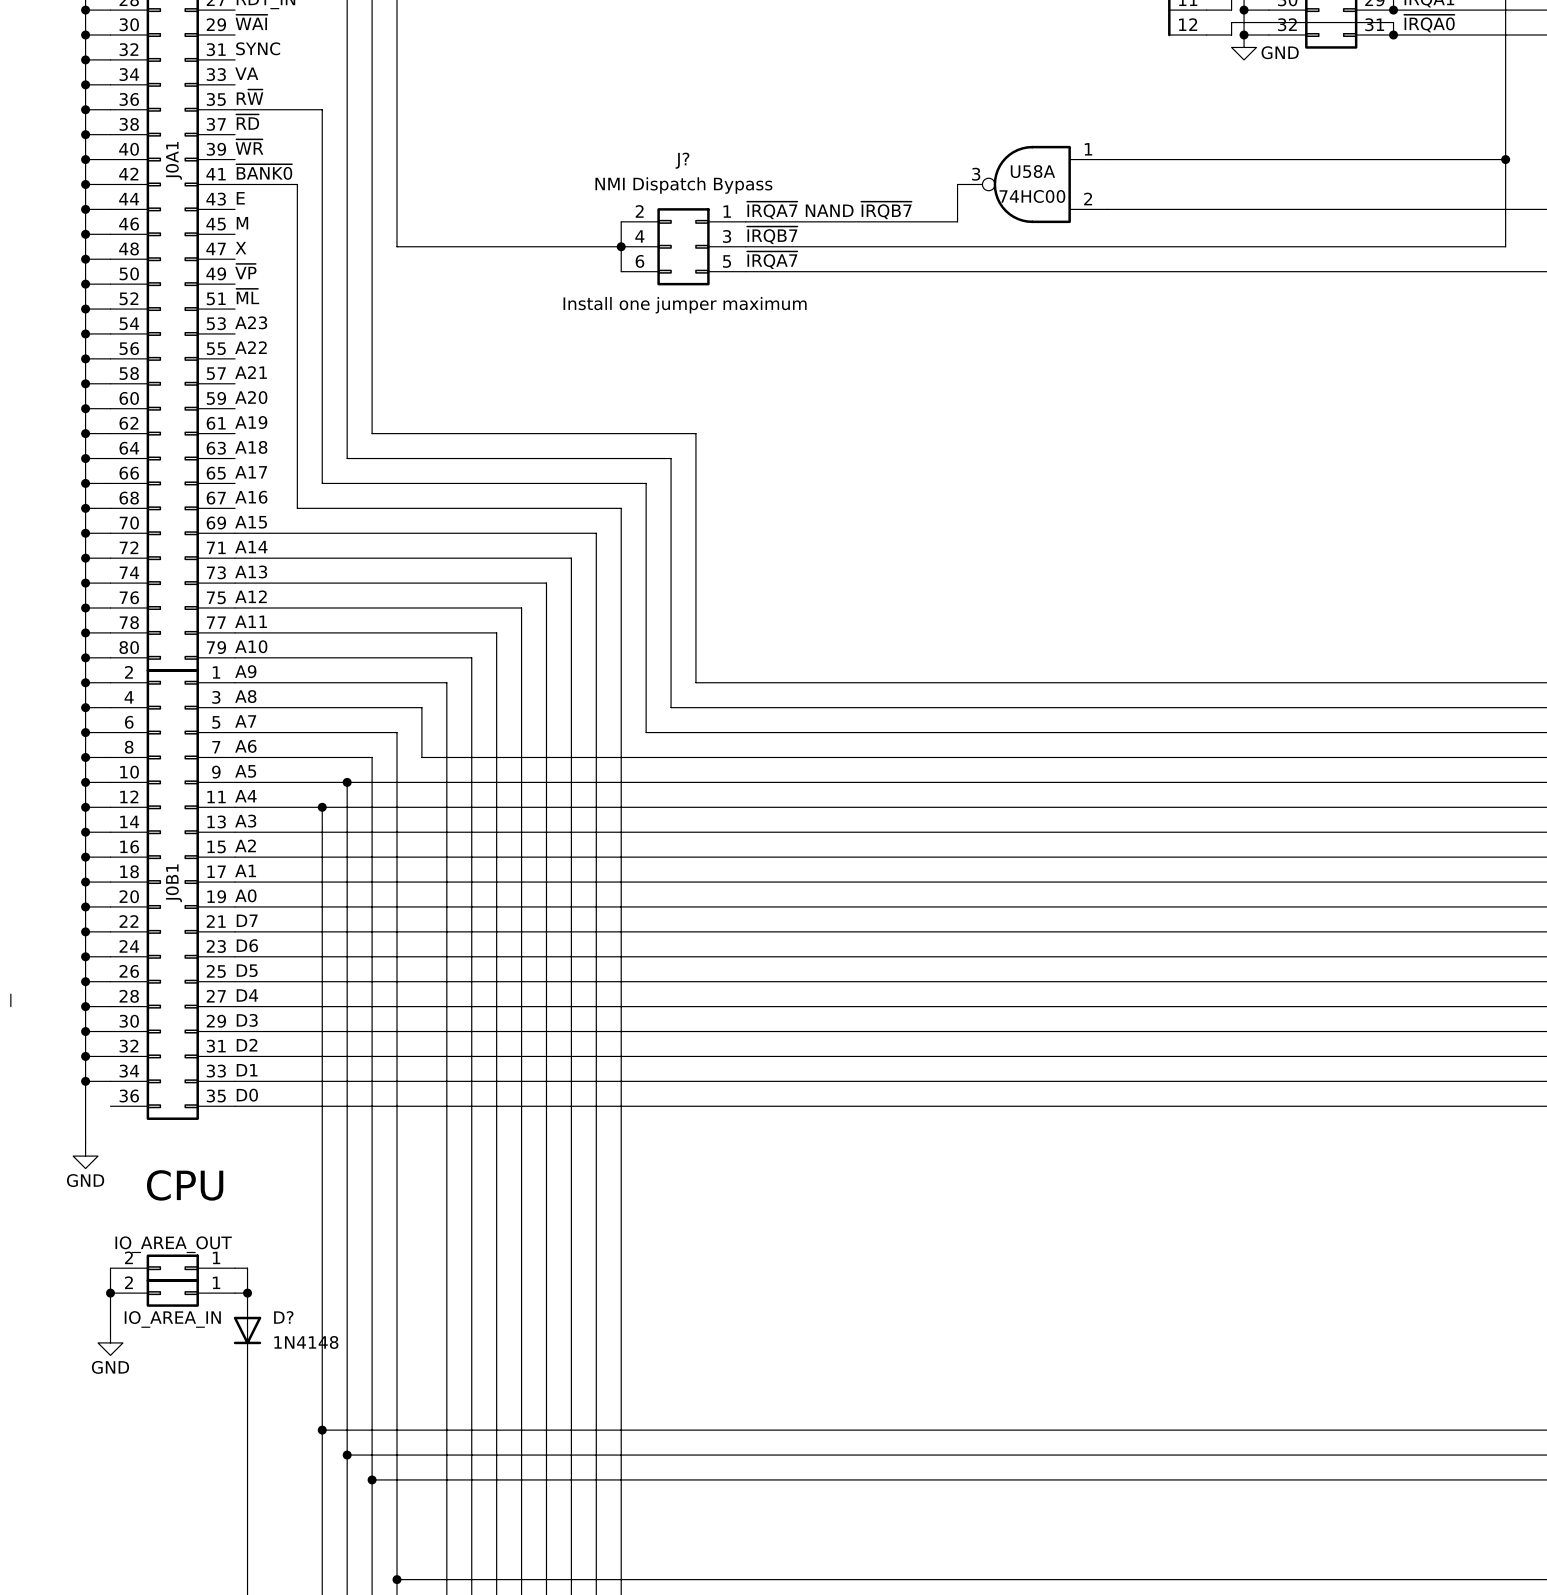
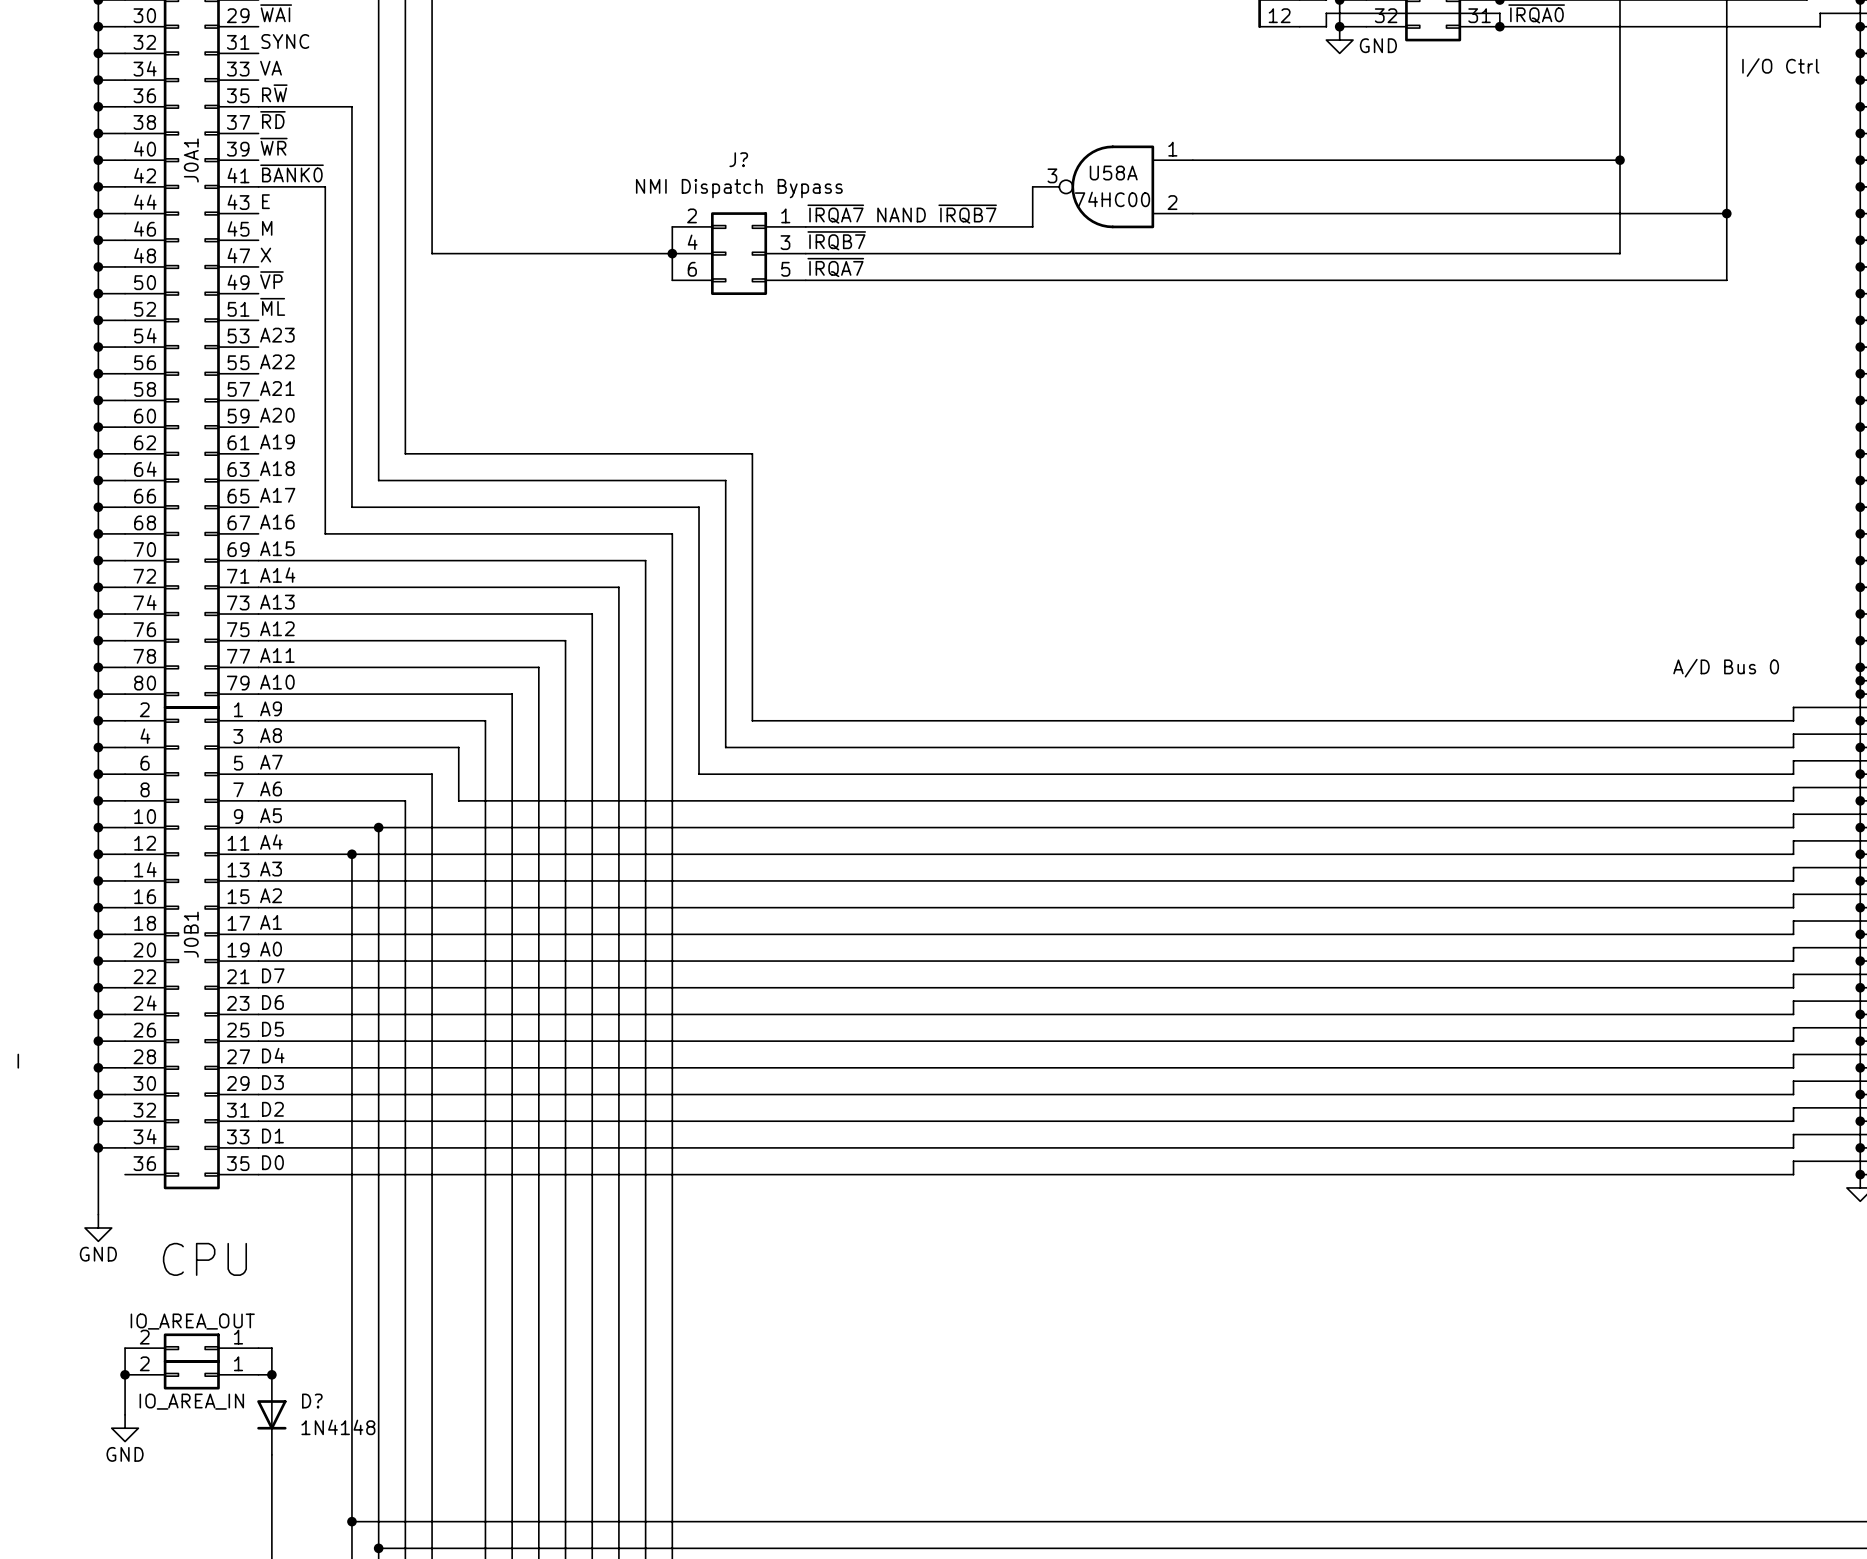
text: Install one jumper maximum (685, 305) -> none

